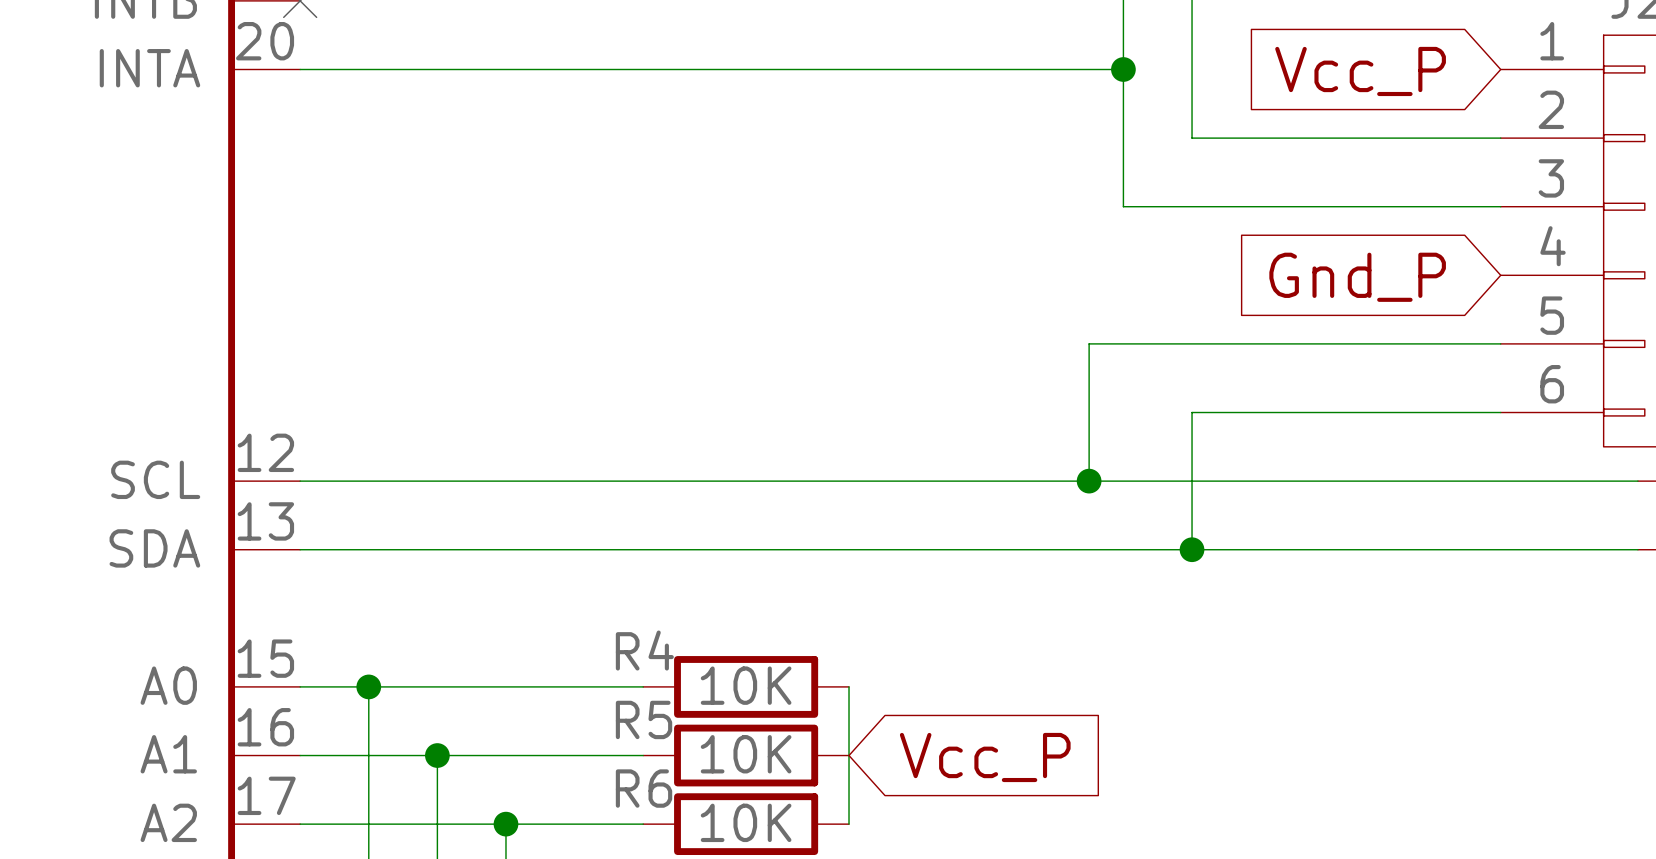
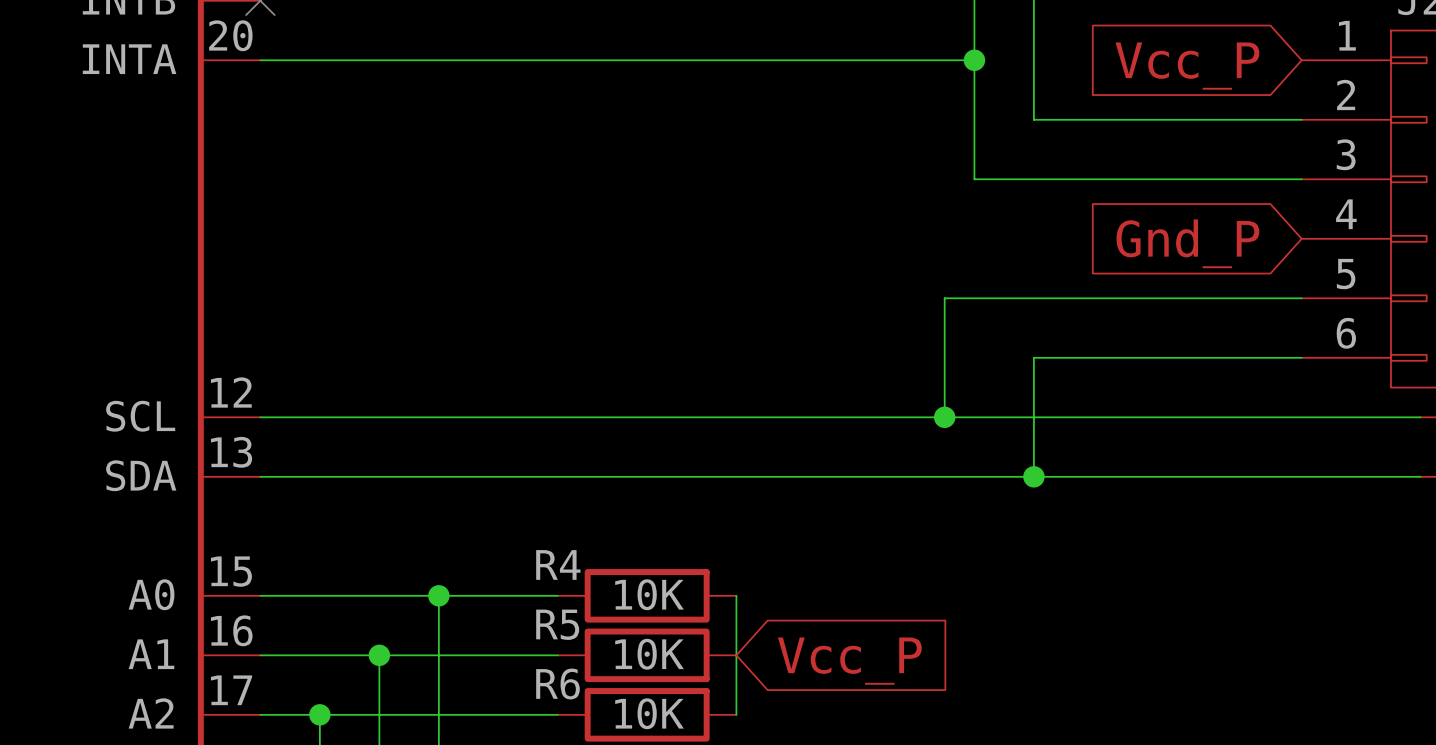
wire: (368, 686) (368, 824) -> (438, 595) (438, 714)
junction: (368, 686) -> none
junction: none -> (438, 595)
junction: none -> (319, 714)
junction: (505, 824) -> none

